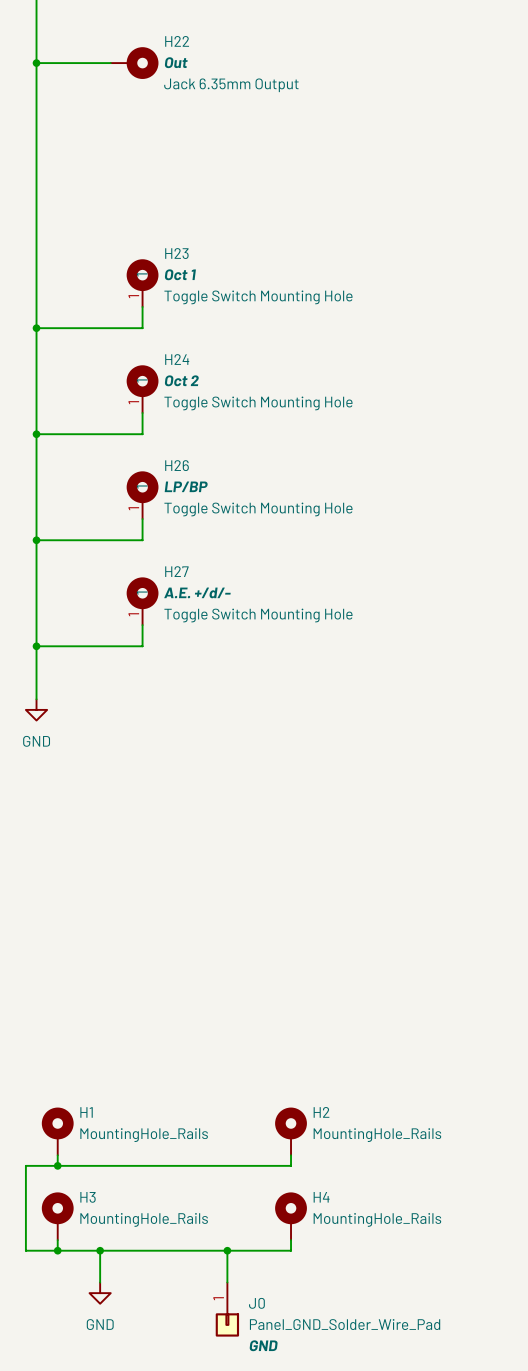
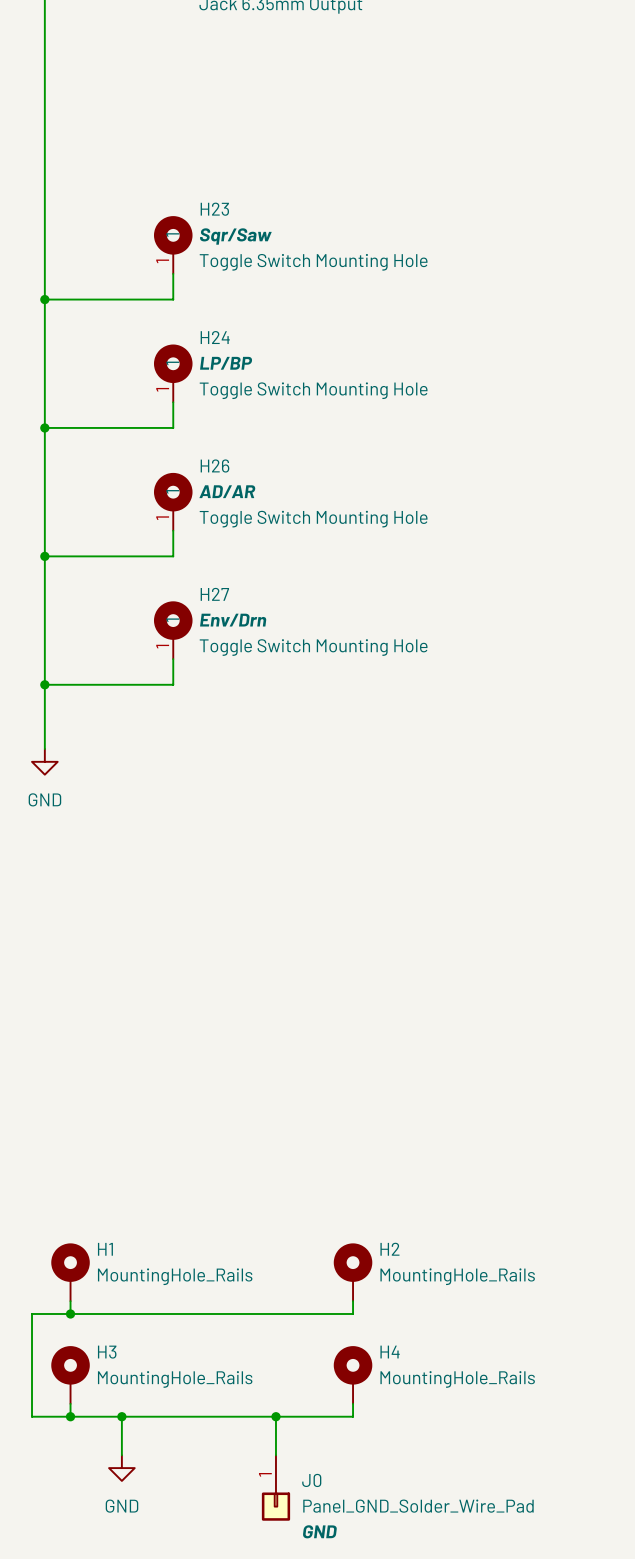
H23 value: Oct 1 (180, 274) -> Sqr/Saw (235, 236)
H24 value: Oct 2 (181, 380) -> LP/BP (226, 363)
H26 value: LP/BP (186, 486) -> AD/AR (227, 491)
H27 value: A.E. +/d/- (197, 592) -> Env/Drn (233, 620)

